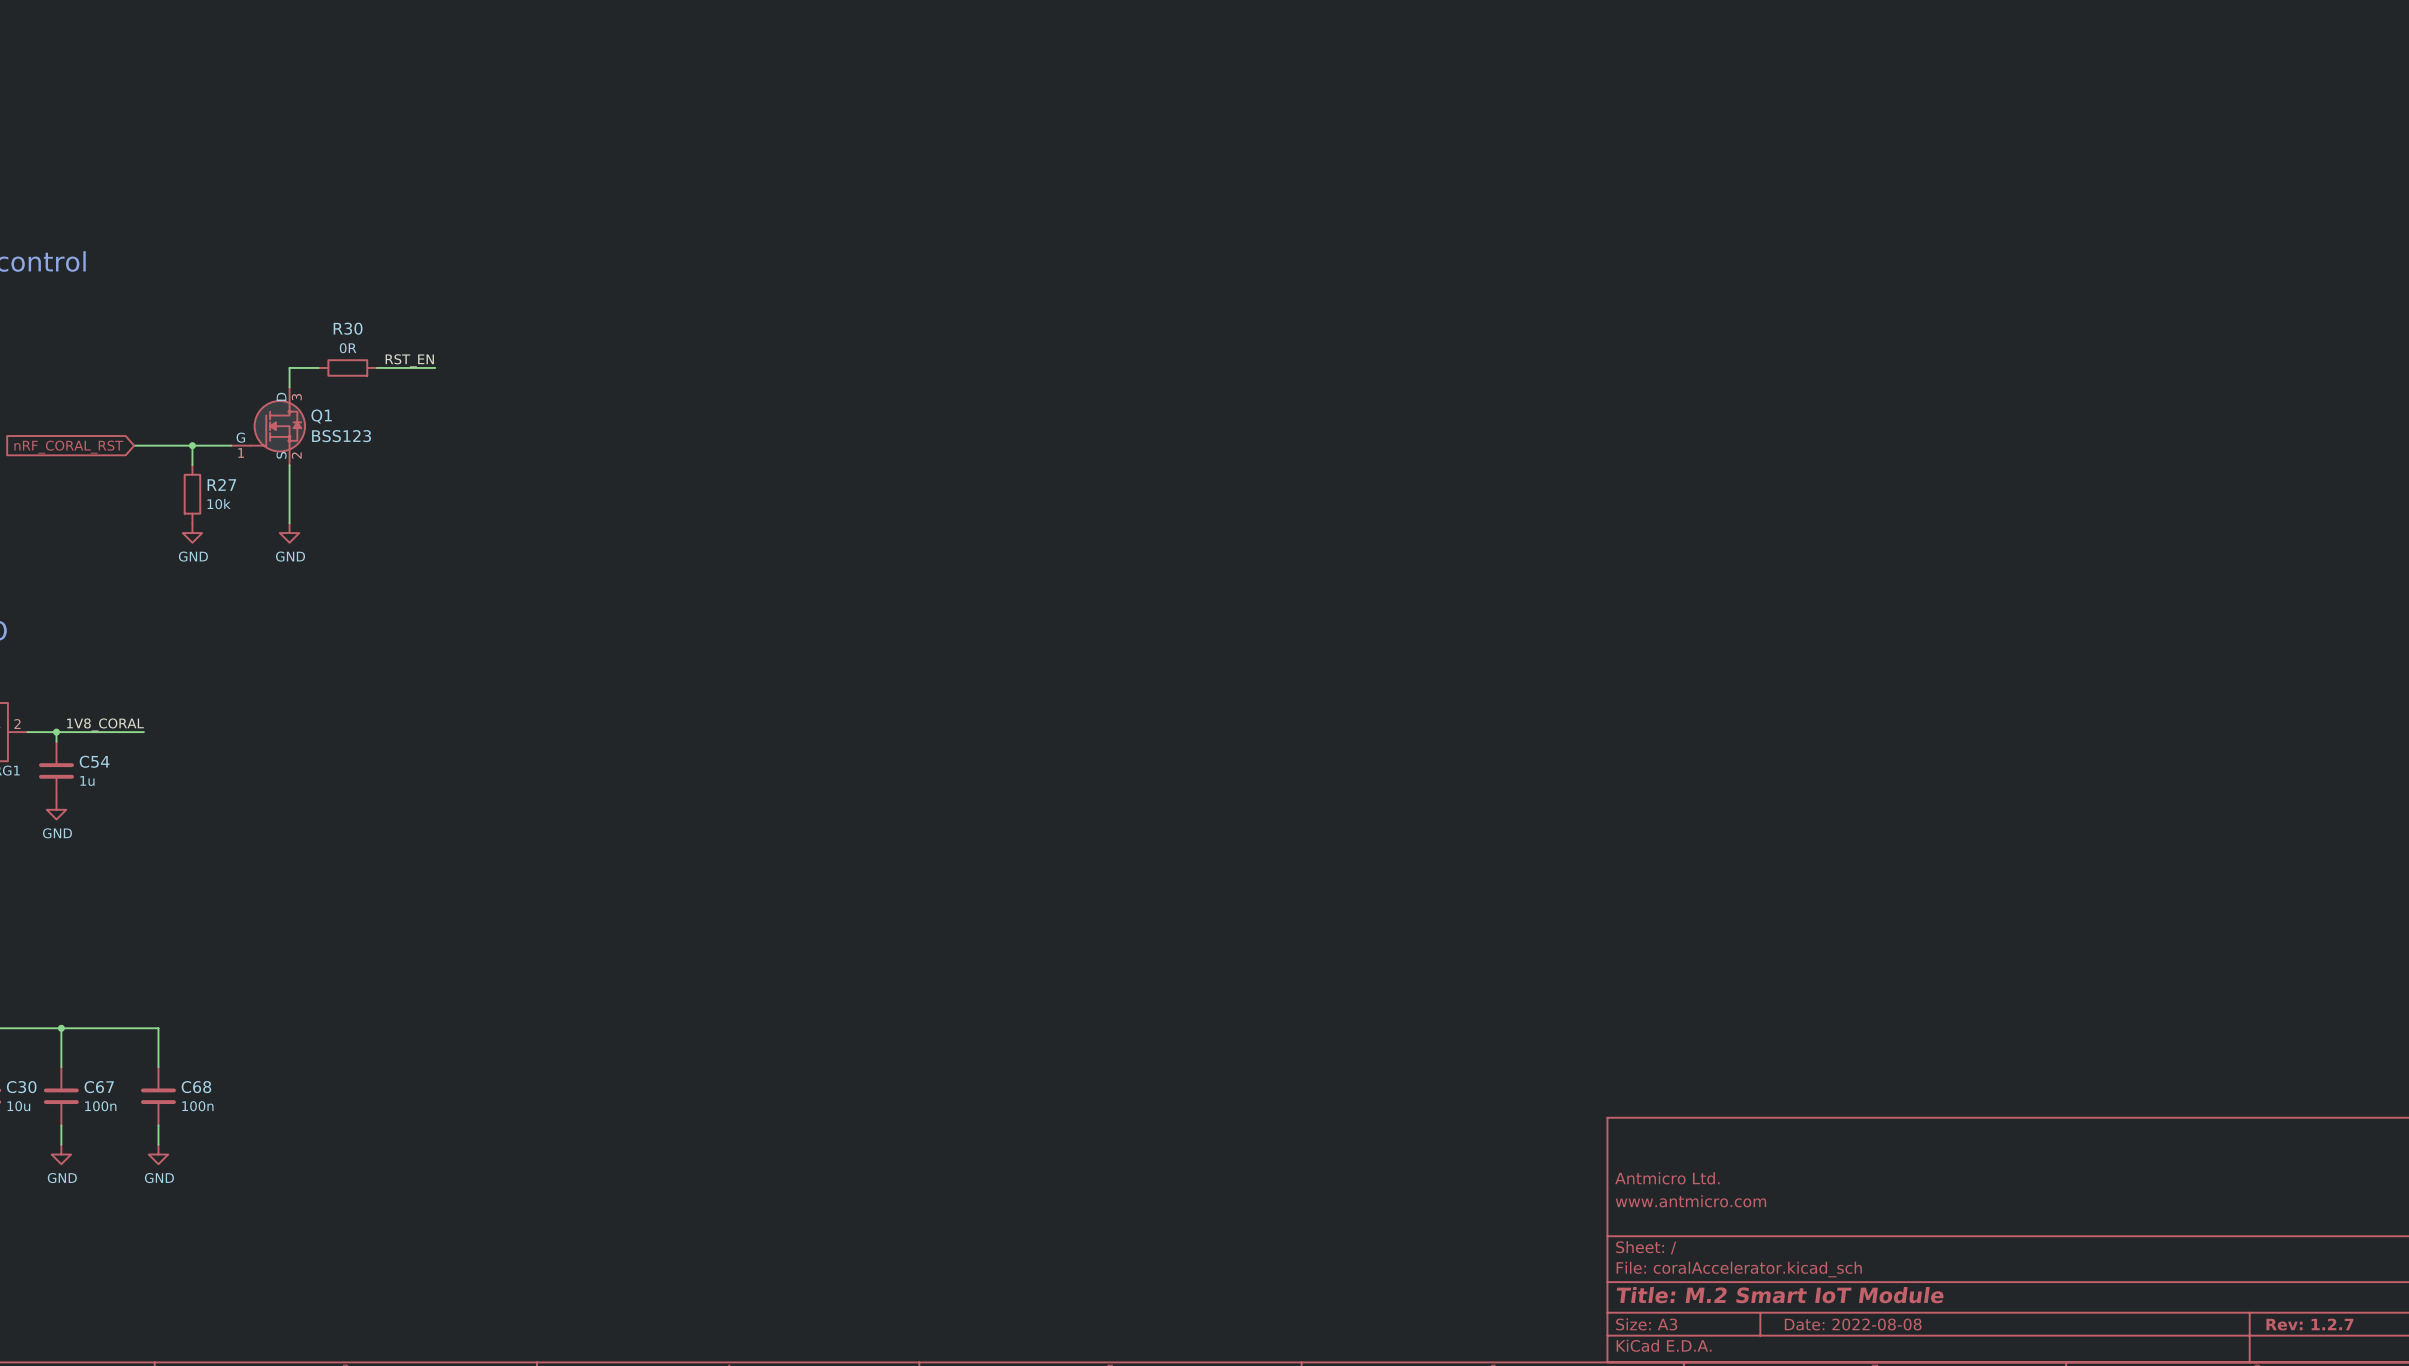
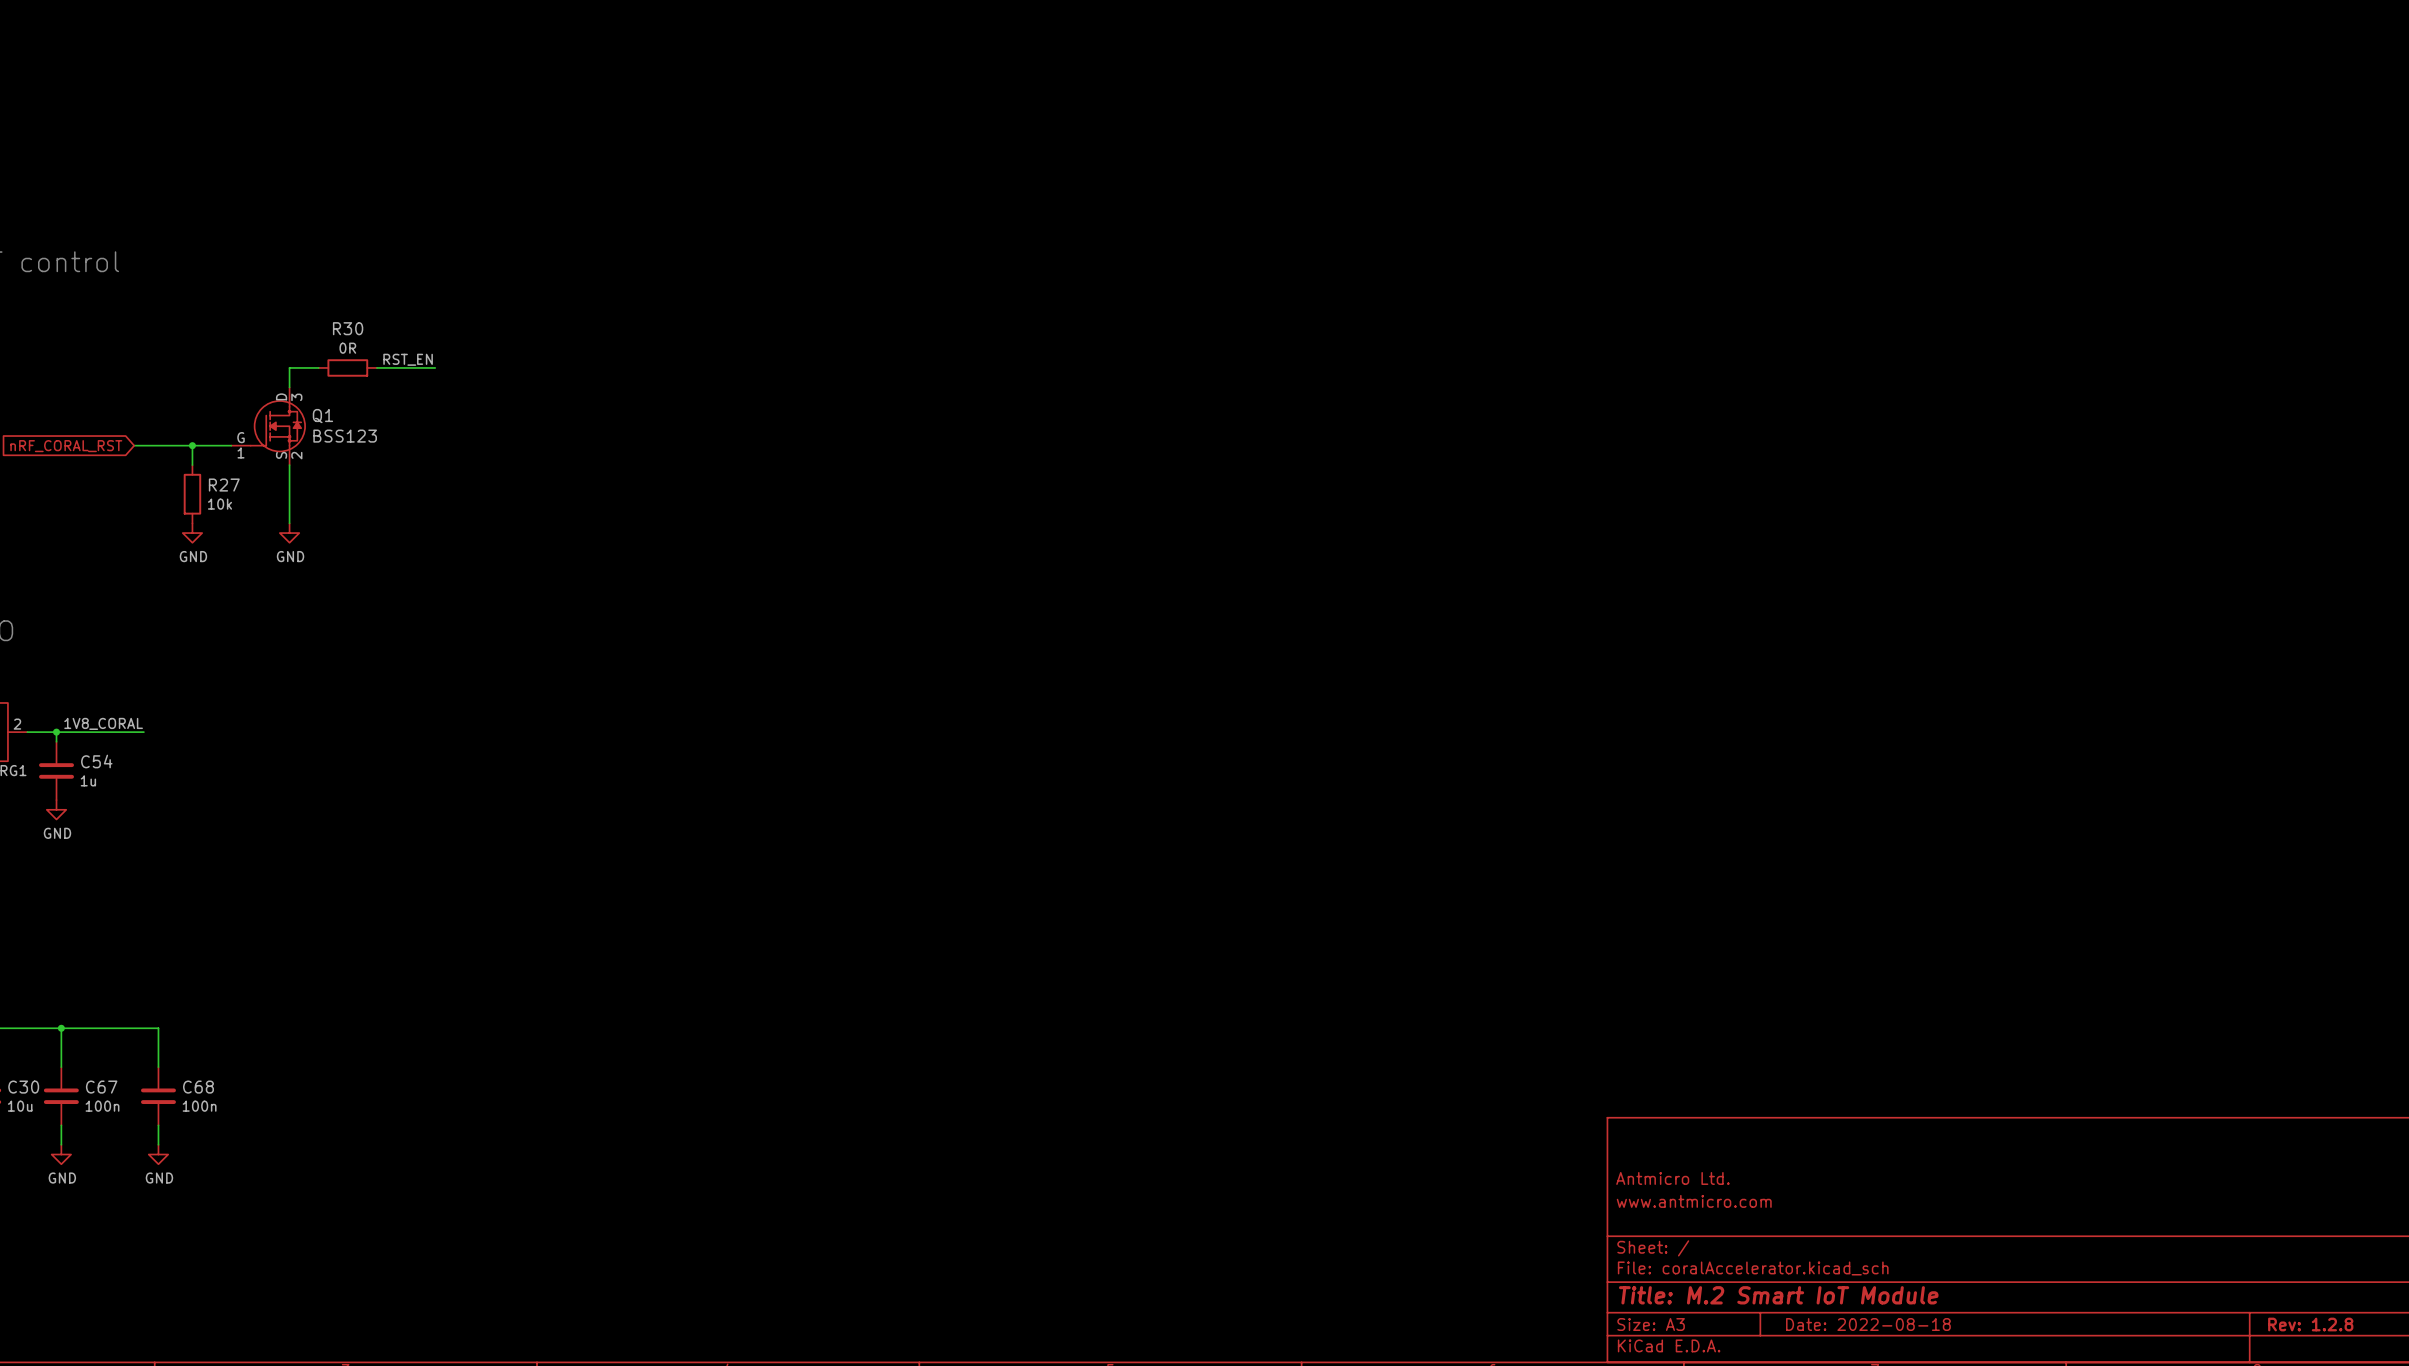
title block: Date: 2022-08-08 (1853, 1324) -> Date: 2022-08-18 (1868, 1324)
title block: Rev: 1.2.7 (2309, 1324) -> Rev: 1.2.8 (2310, 1324)

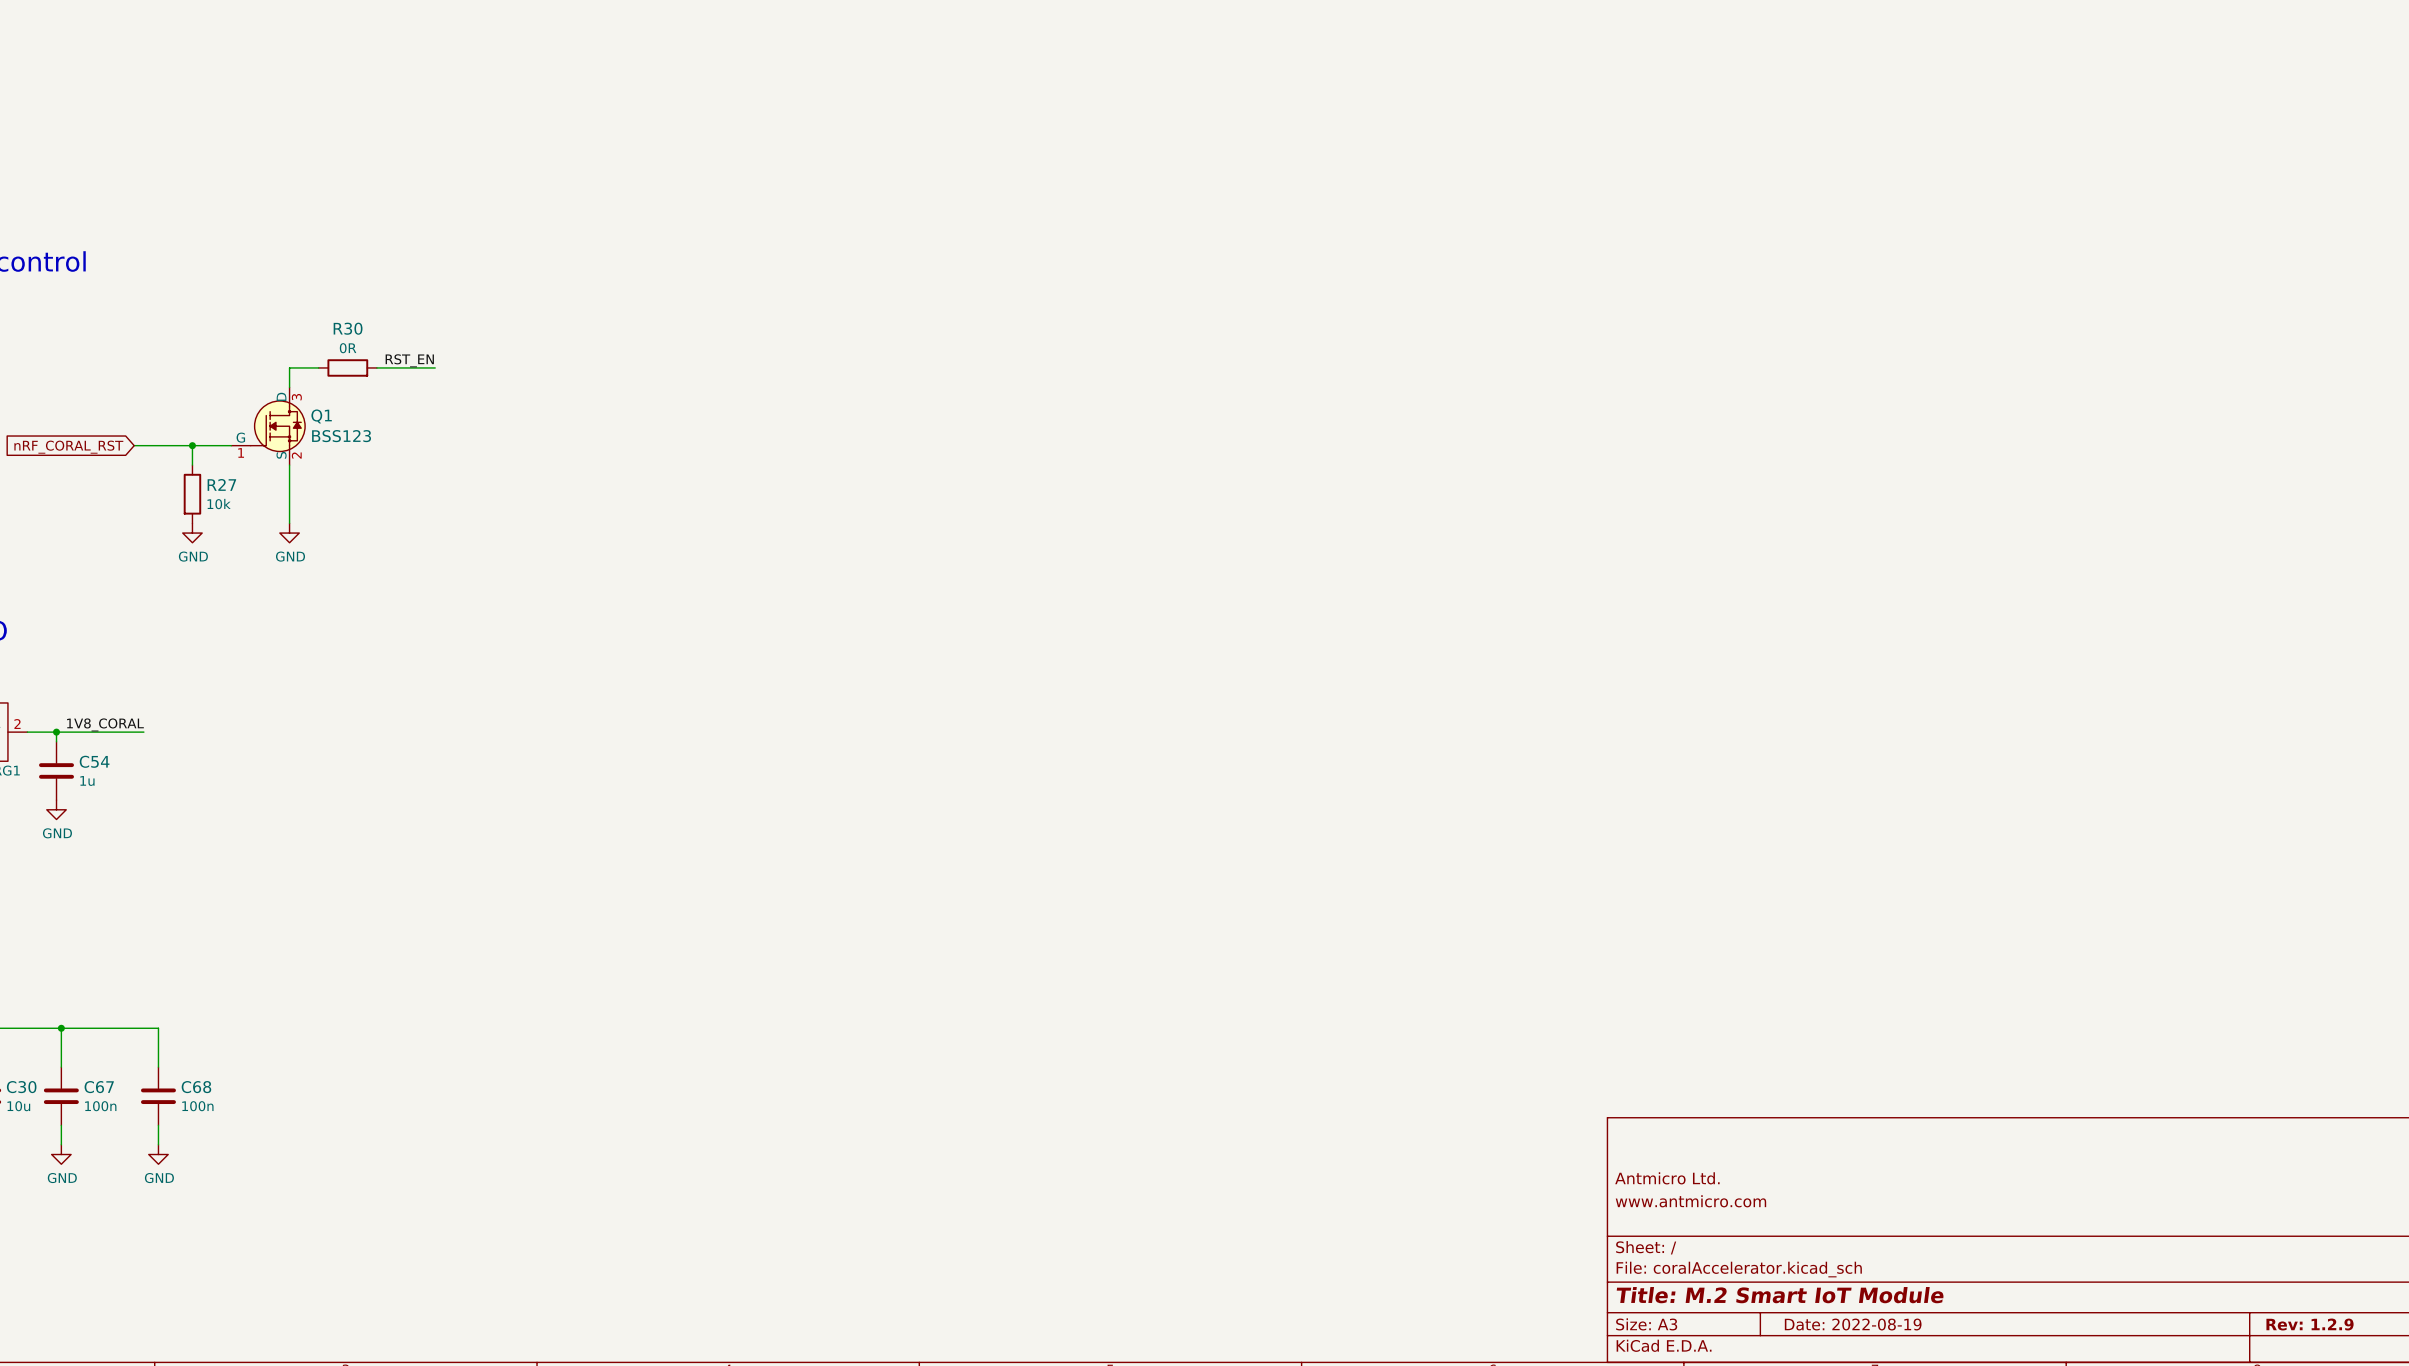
title block: Date: 2022-08-18 (1868, 1324) -> Date: 2022-08-19 (1853, 1324)
title block: Rev: 1.2.8 (2310, 1324) -> Rev: 1.2.9 (2310, 1324)

